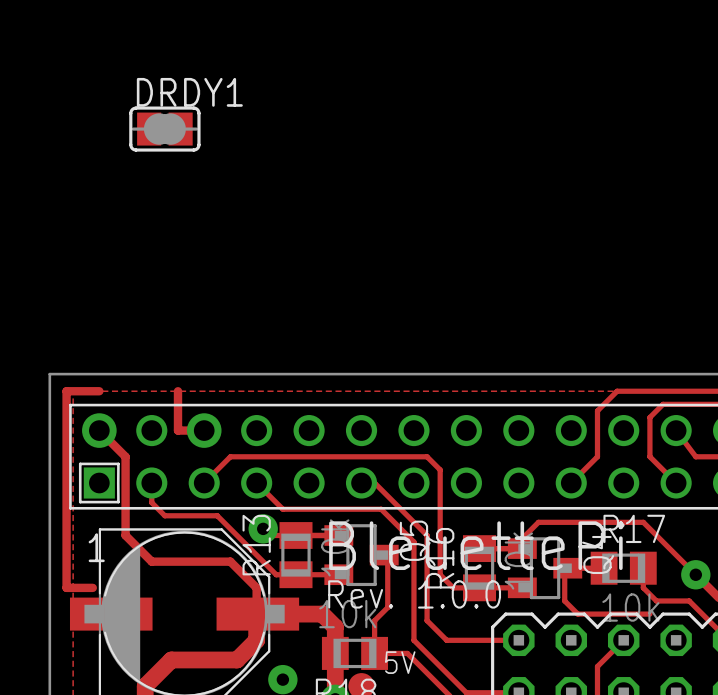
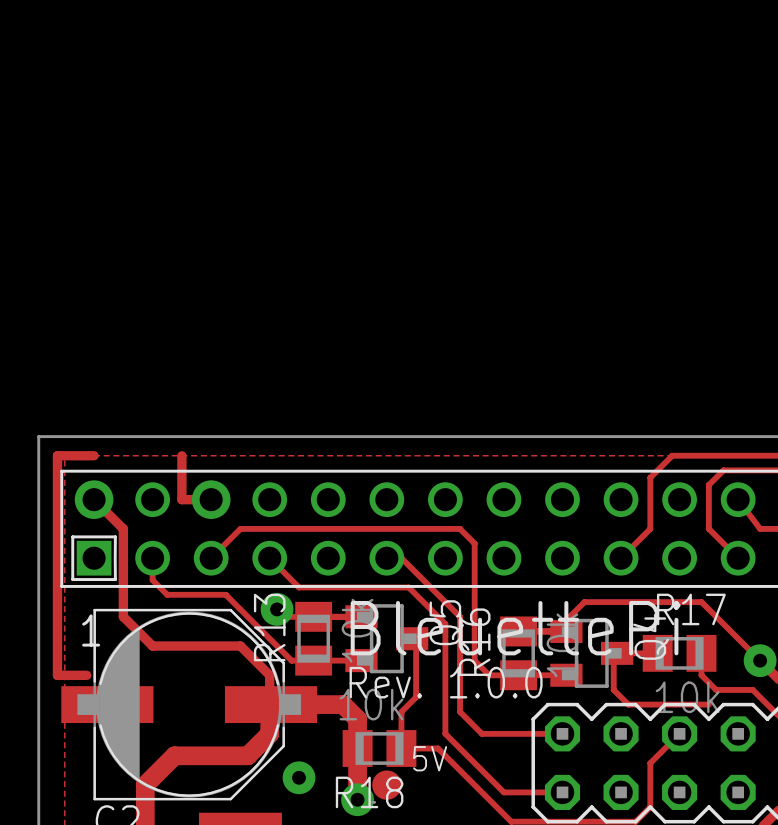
DRDY1: (164, 129) -> none

